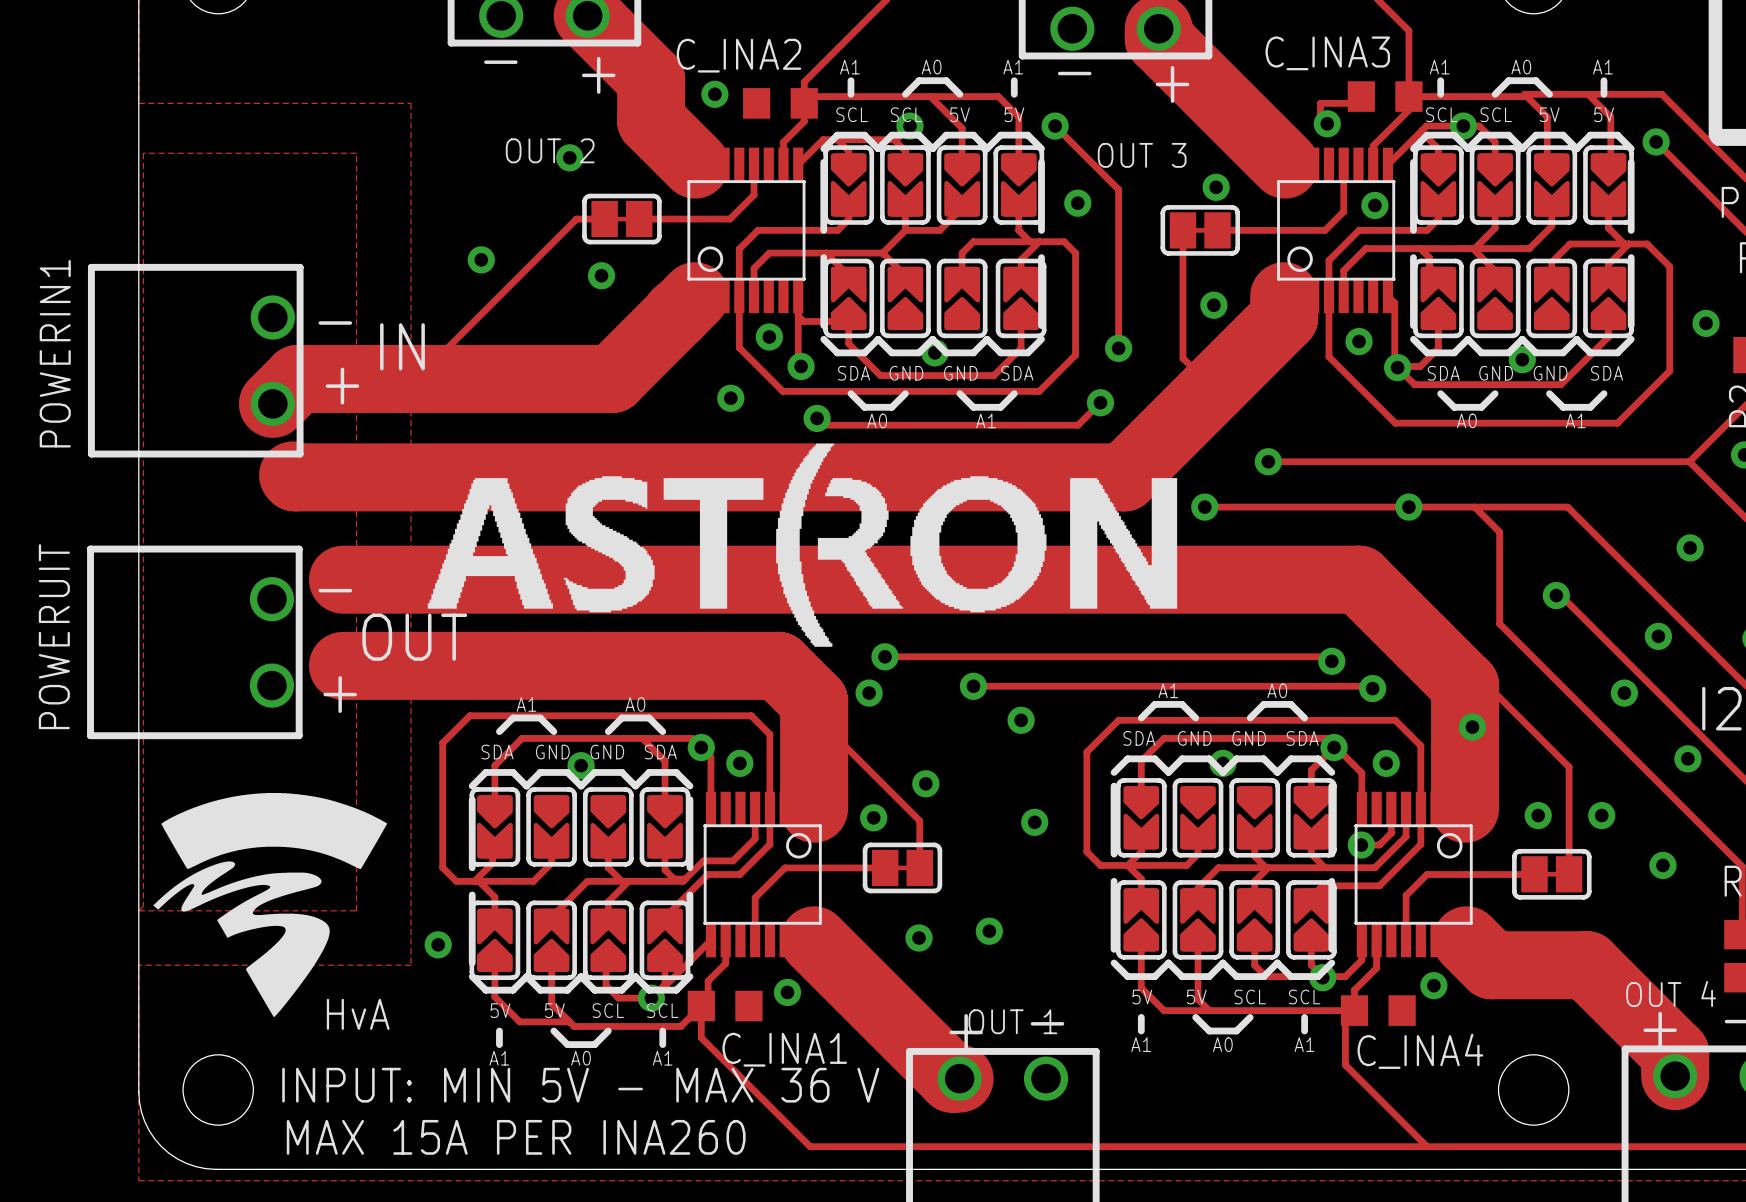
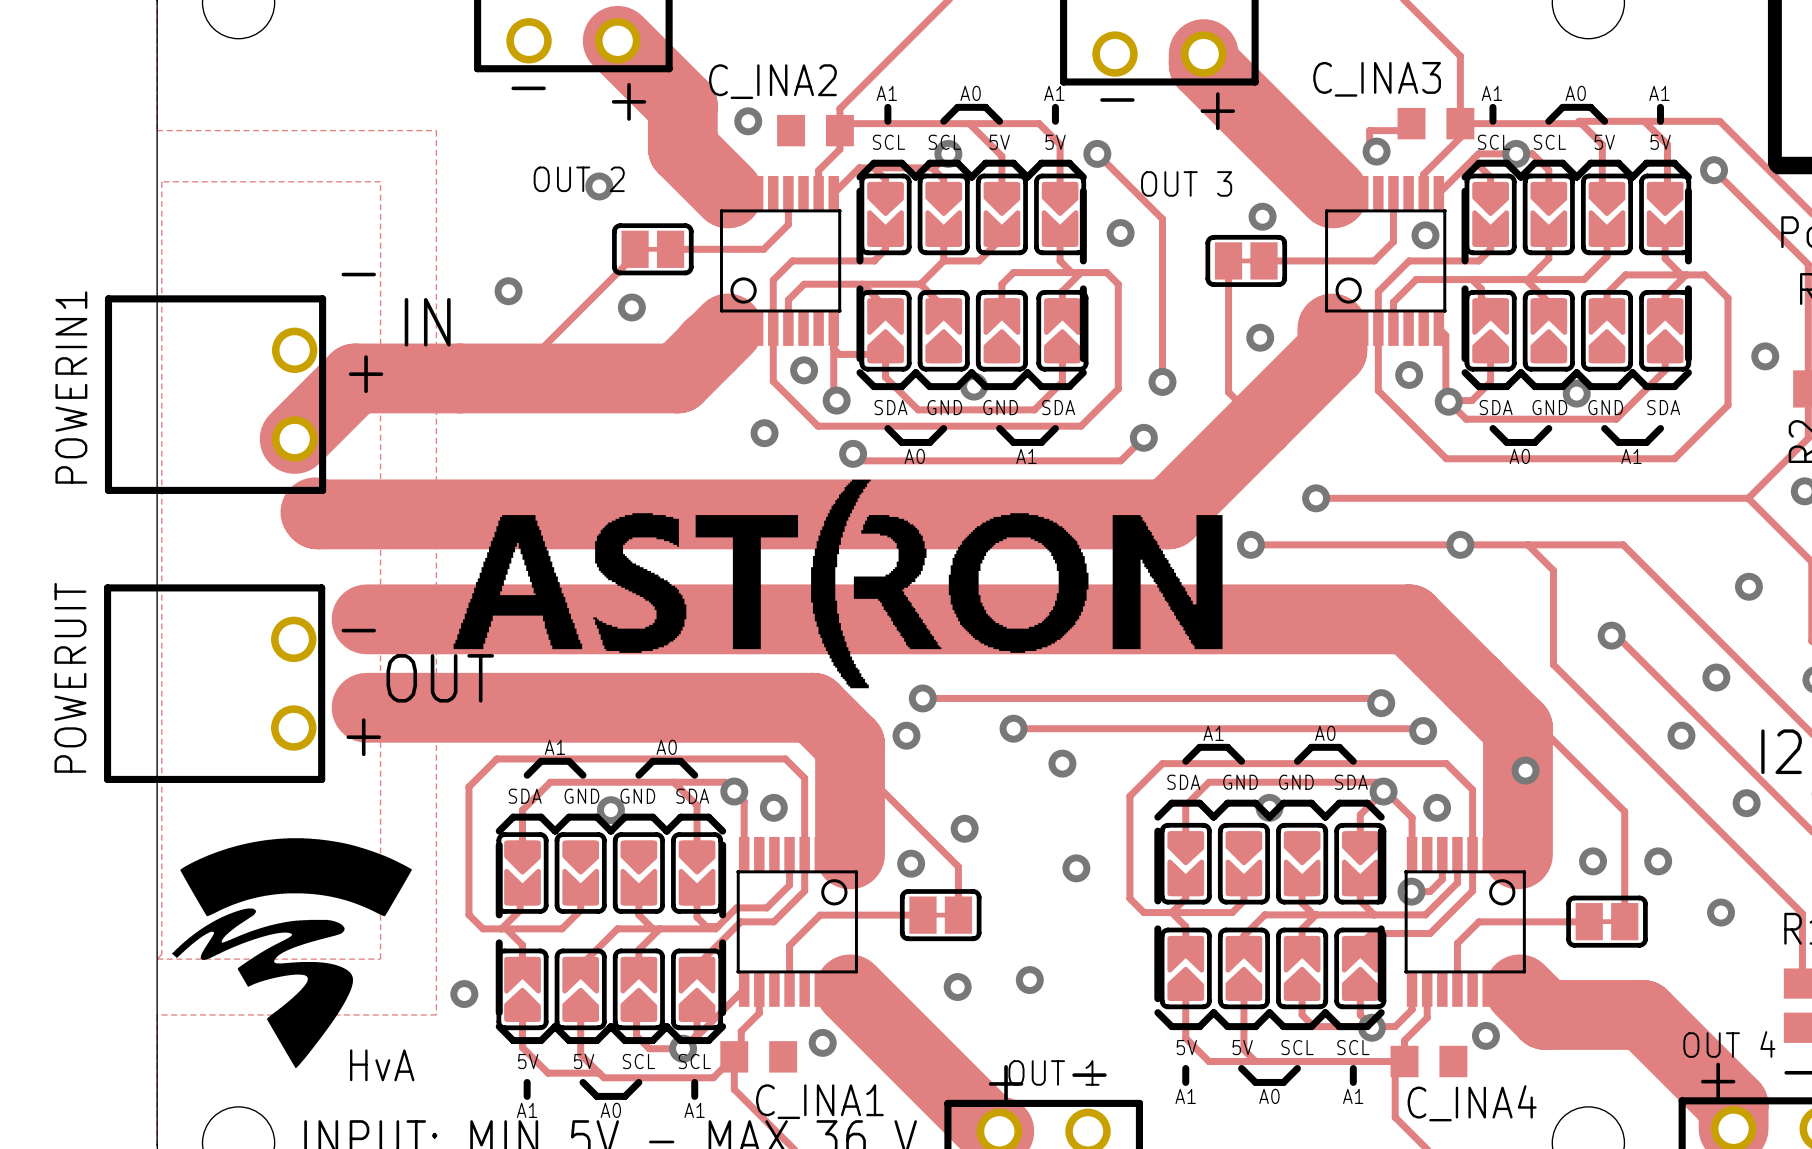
track: (604, 219) (576, 219) (416, 378) (399, 378) -> (635, 249) (635, 255) (527, 363) (474, 363) (459, 378)
text position: _ (335, 323) -> _ (358, 274)
track: (646, 344) (612, 378) (297, 378) -> (677, 378) (355, 378) (320, 413)
text position: IN (402, 346) -> IN (427, 322)
text position: + (342, 386) -> + (366, 374)

